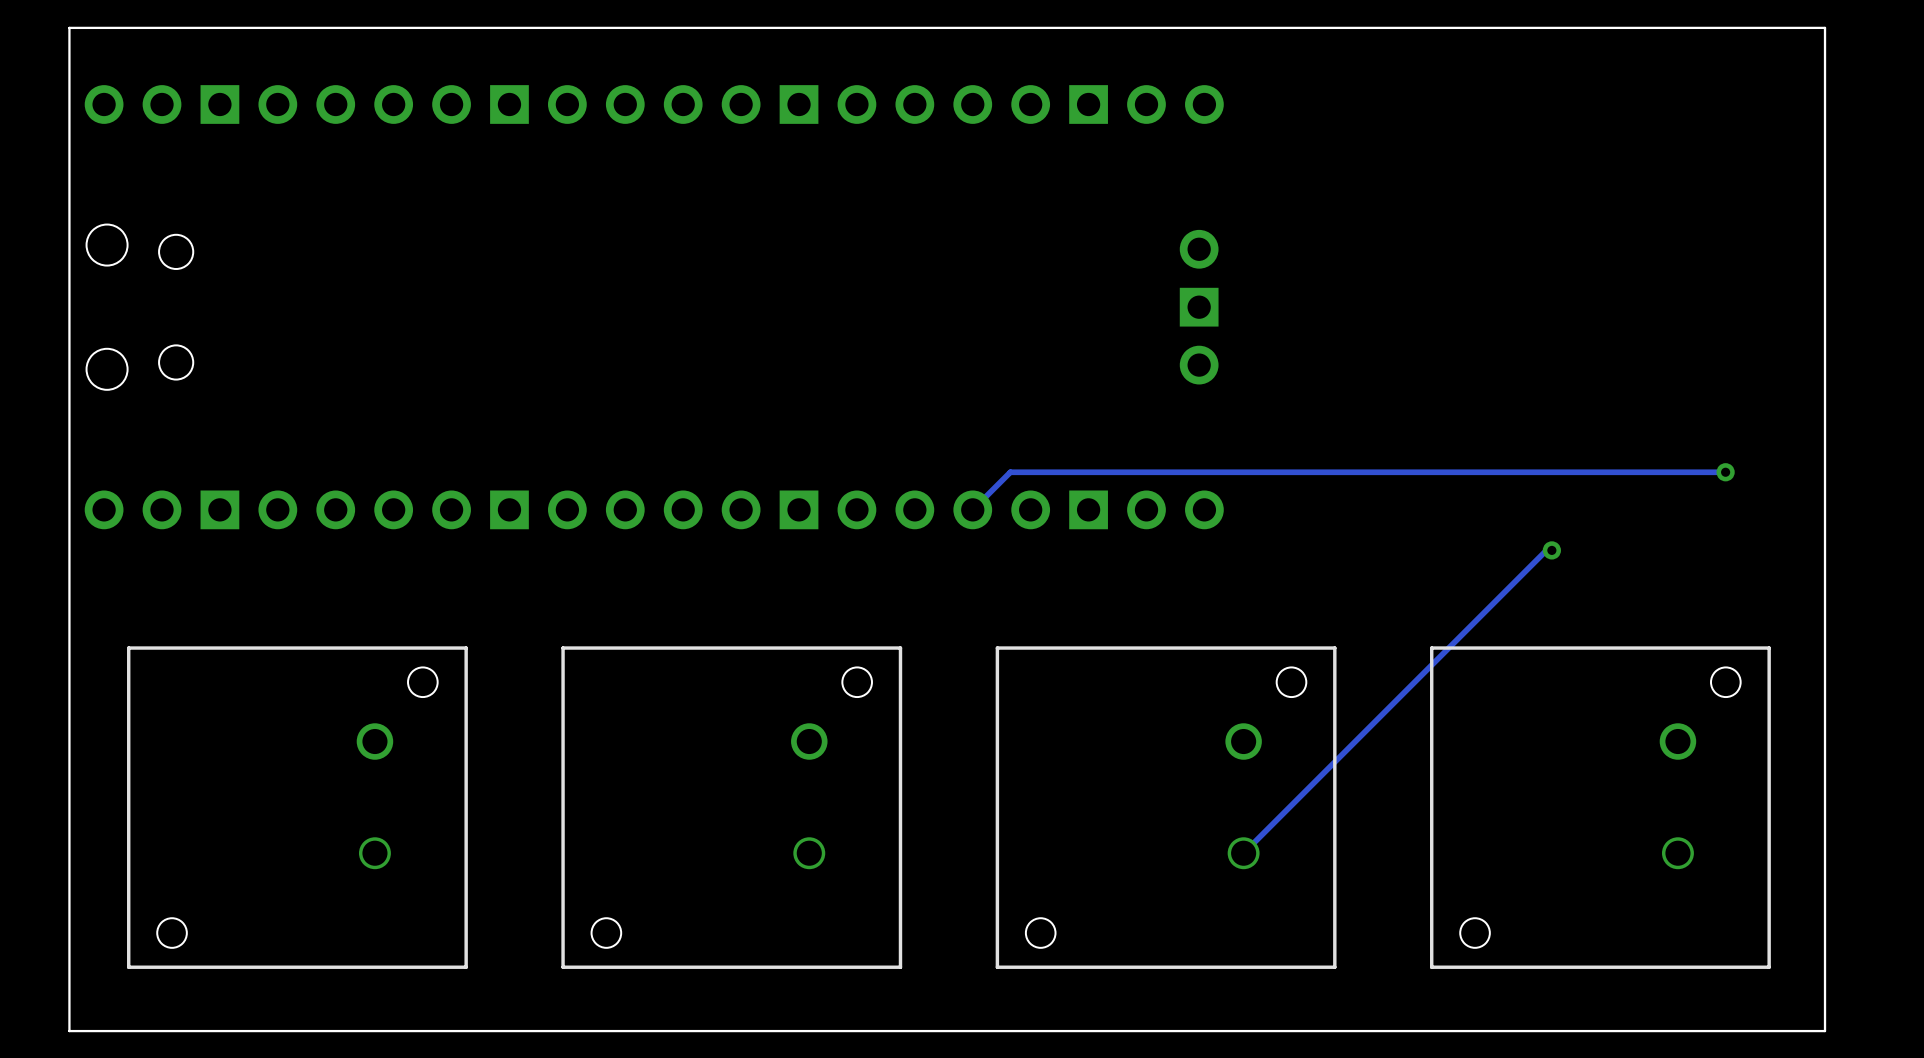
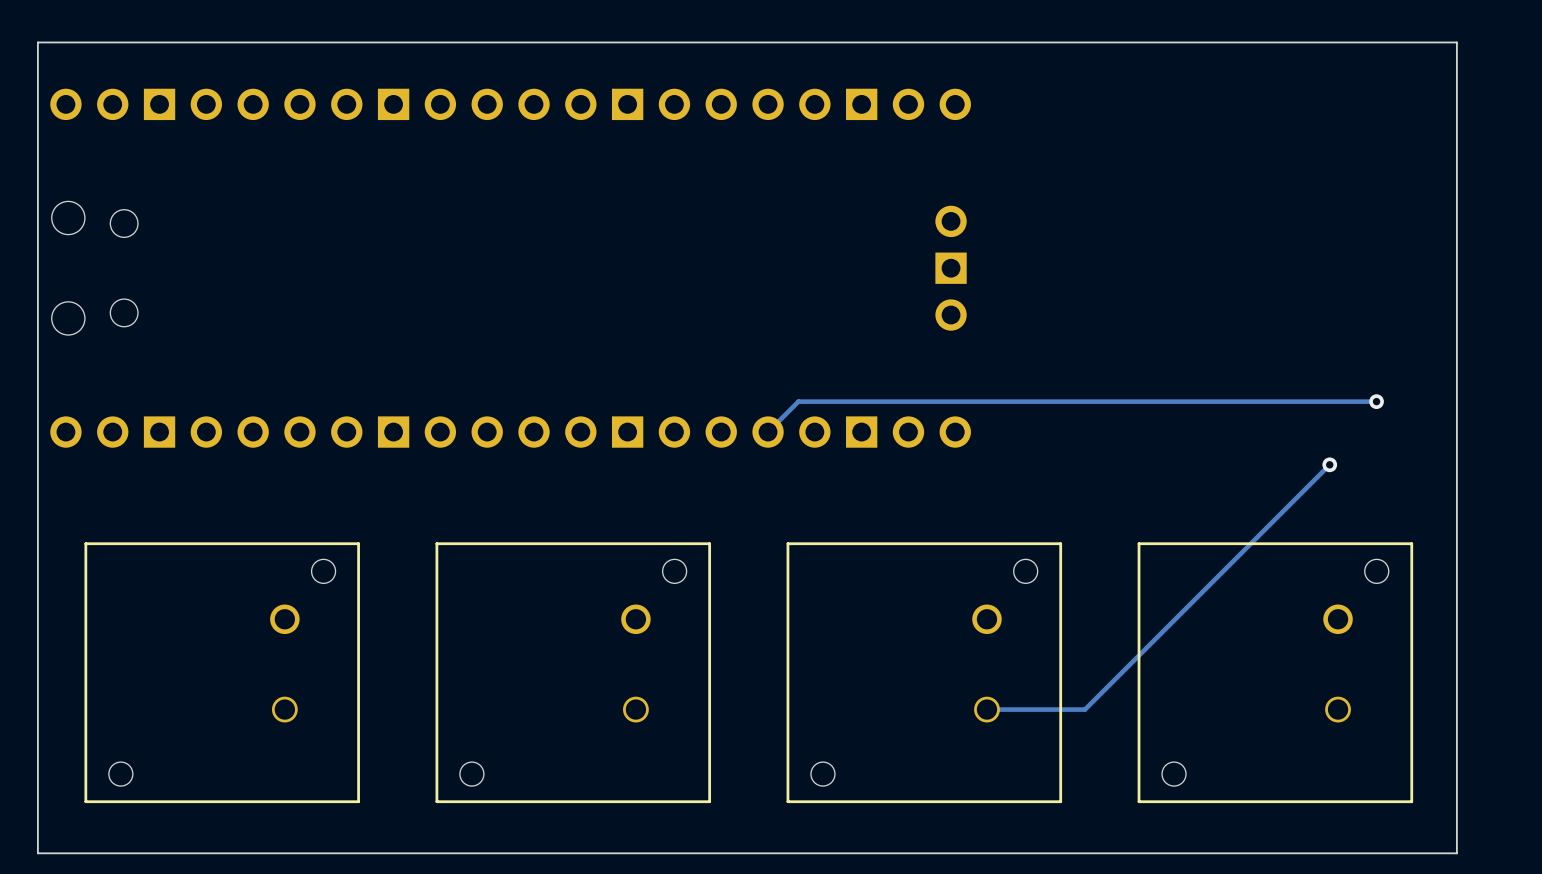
track: (1551, 550) (1546, 550) (1243, 853) -> (1329, 464) (1084, 709) (986, 709)
via position: (1551, 550) -> (1329, 464)

